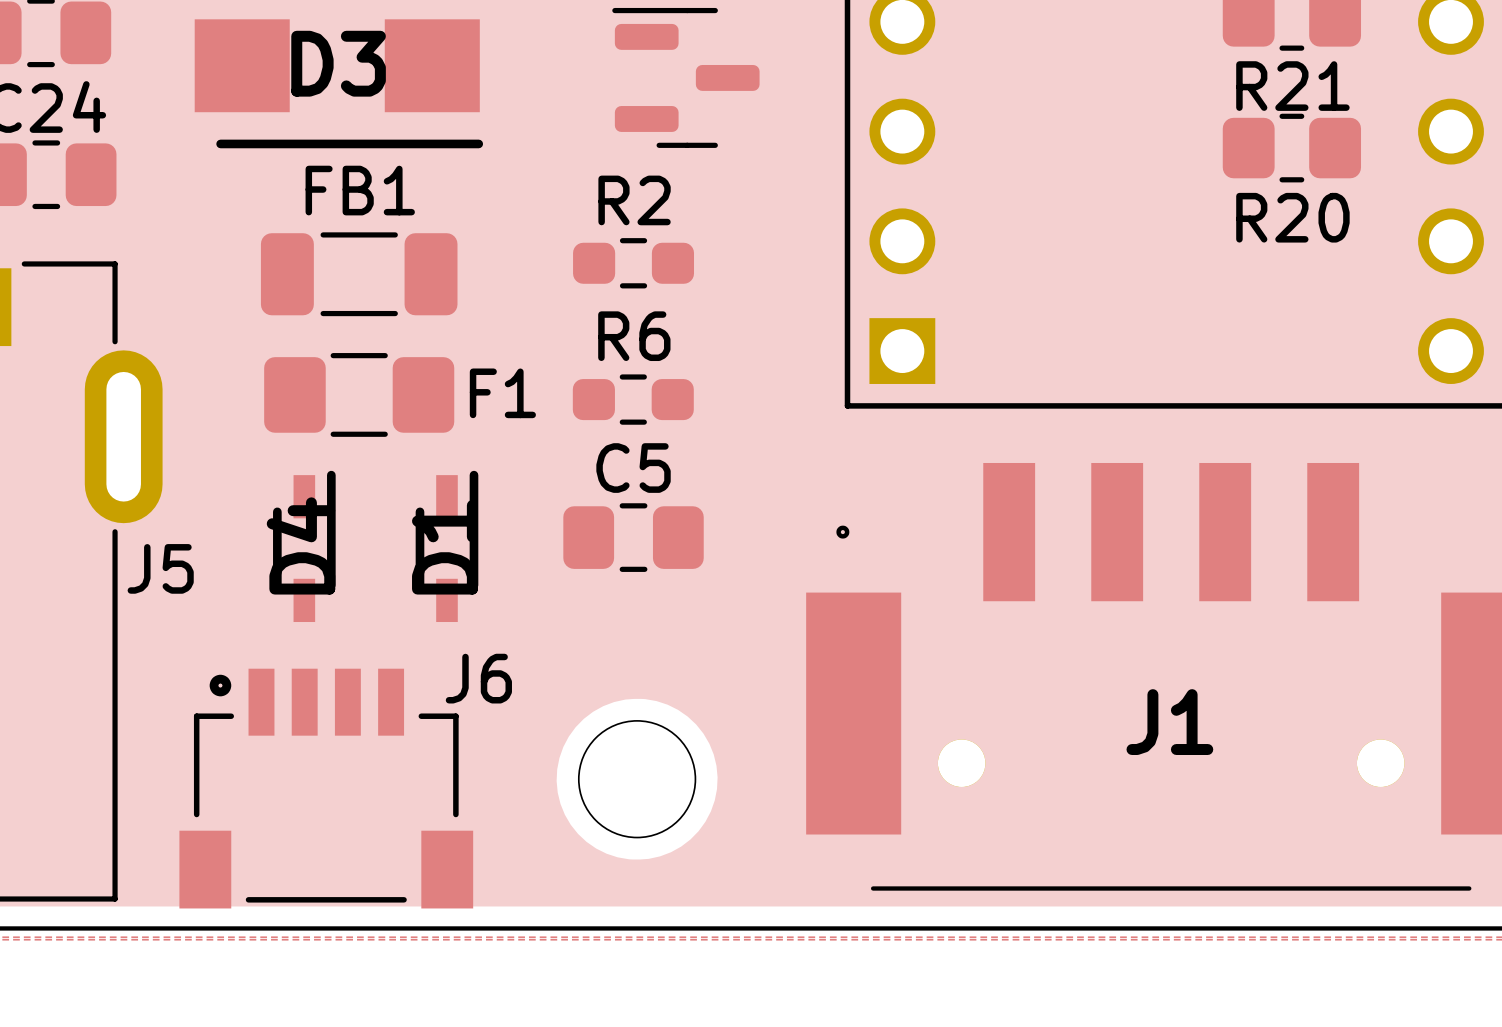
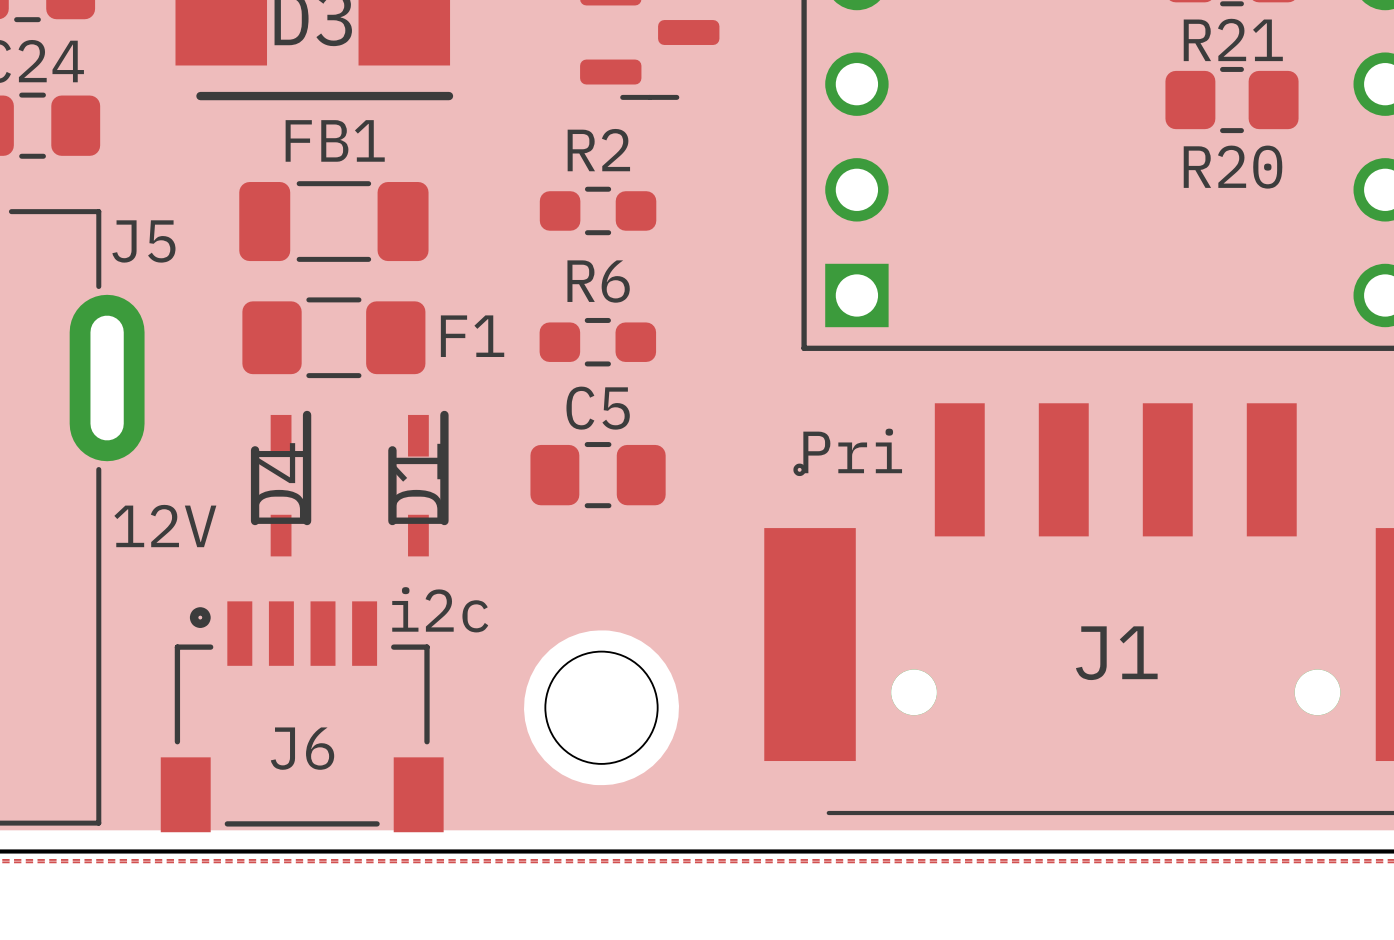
text: none -> Pri (852, 450)
J5 name position: J5 (160, 568) -> J5 (143, 241)
text: none -> 12V (165, 526)
text: none -> i2c (440, 609)
J6 name position: J6 (478, 678) -> J6 (302, 748)

